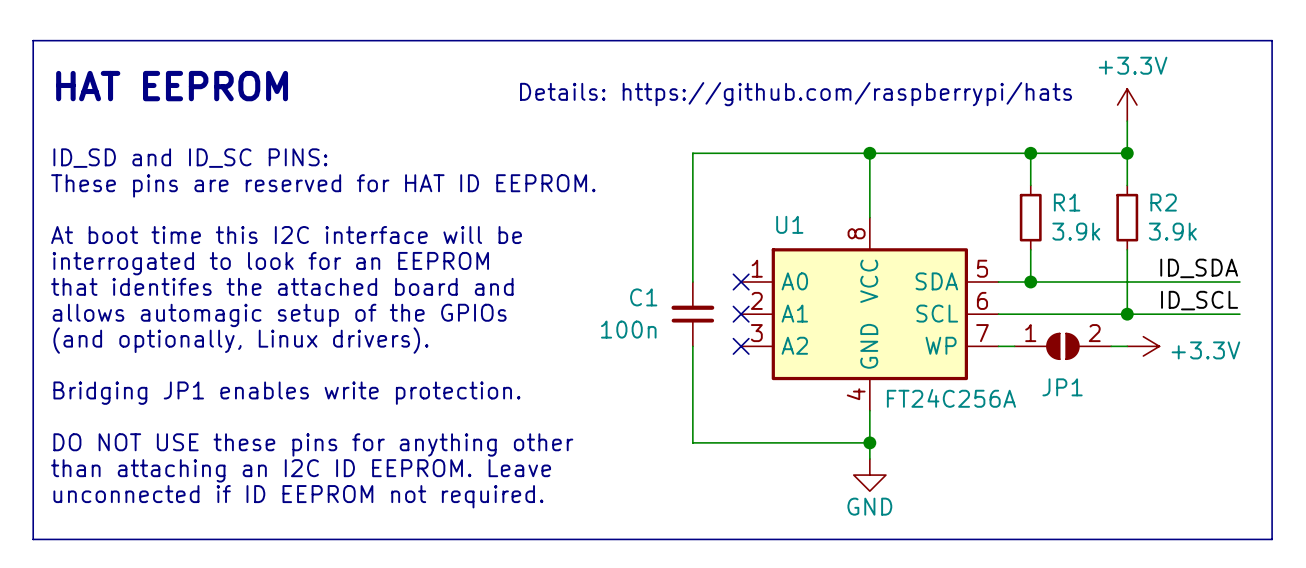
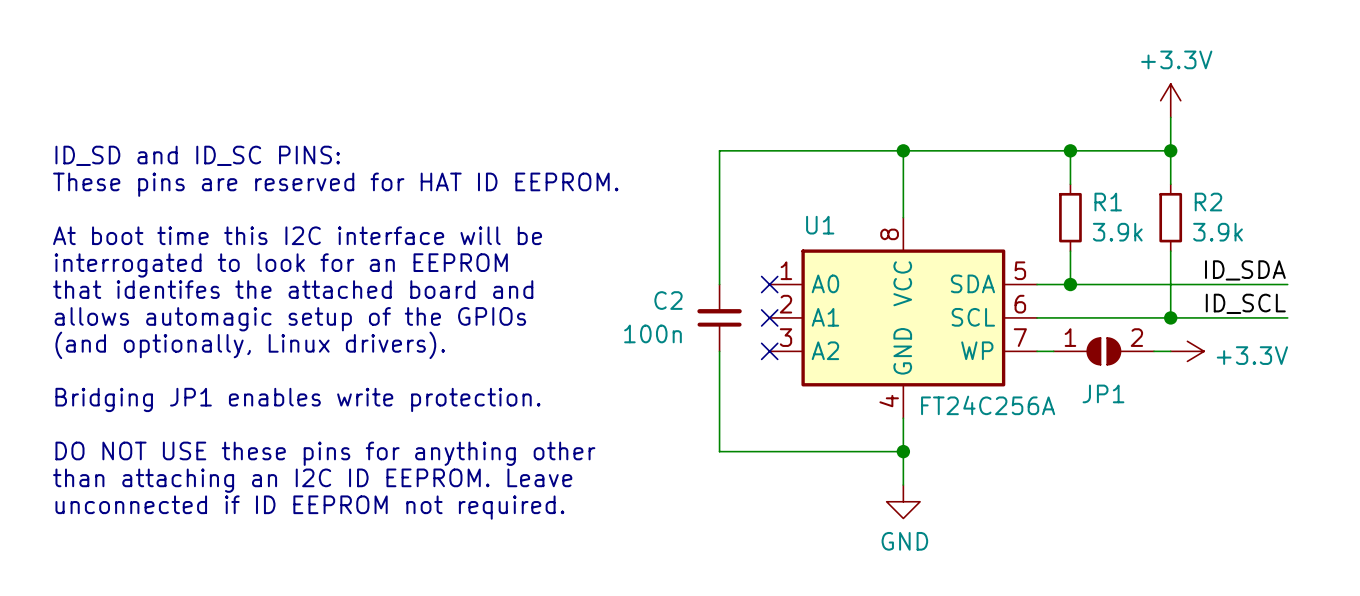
line: (33, 40) (1272, 40) (1272, 539) (33, 539) (33, 40) -> none
text: HAT EEPROM (172, 86) -> none
text: Details: https://github.com/raspberrypi/hats (796, 94) -> none
C1 name: C1 (643, 297) -> C2 (668, 300)
power symbol position: GND (869, 475) -> GND (903, 501)
power symbol text position: GND (869, 506) -> GND (904, 541)

